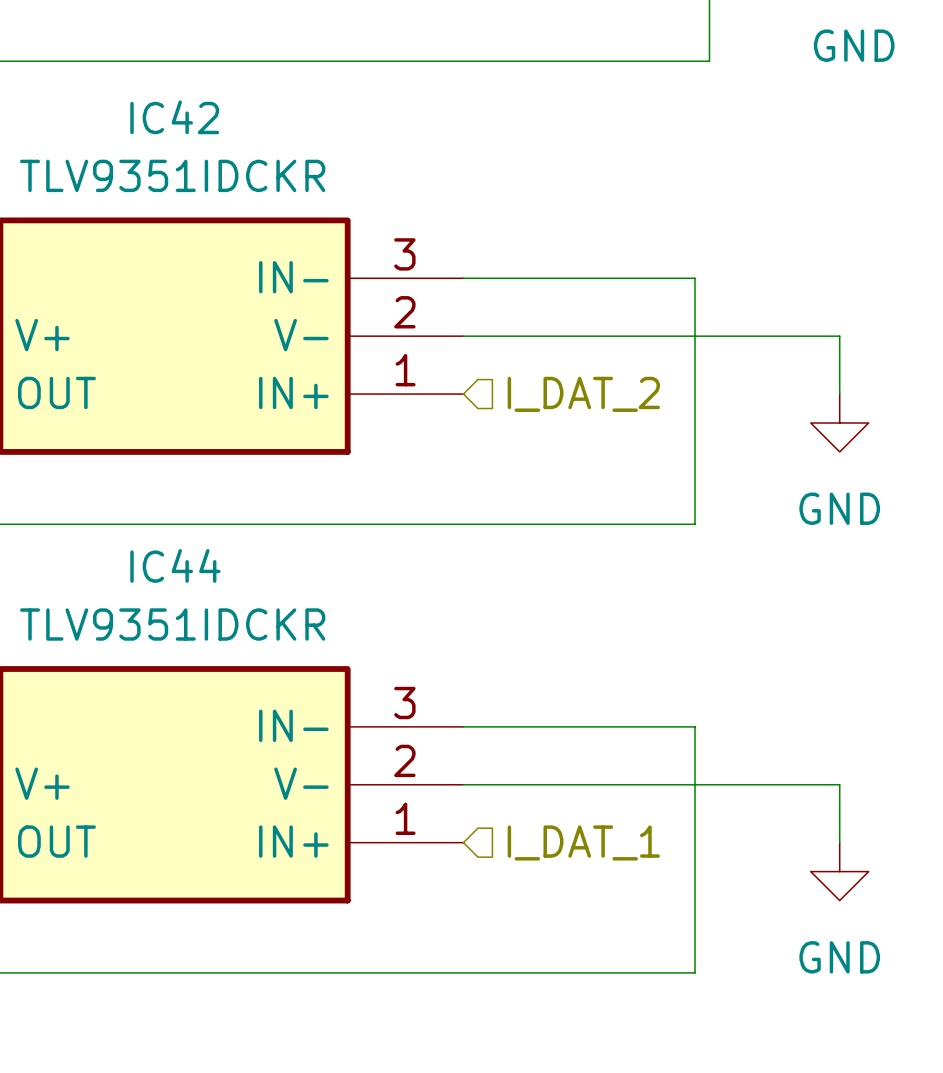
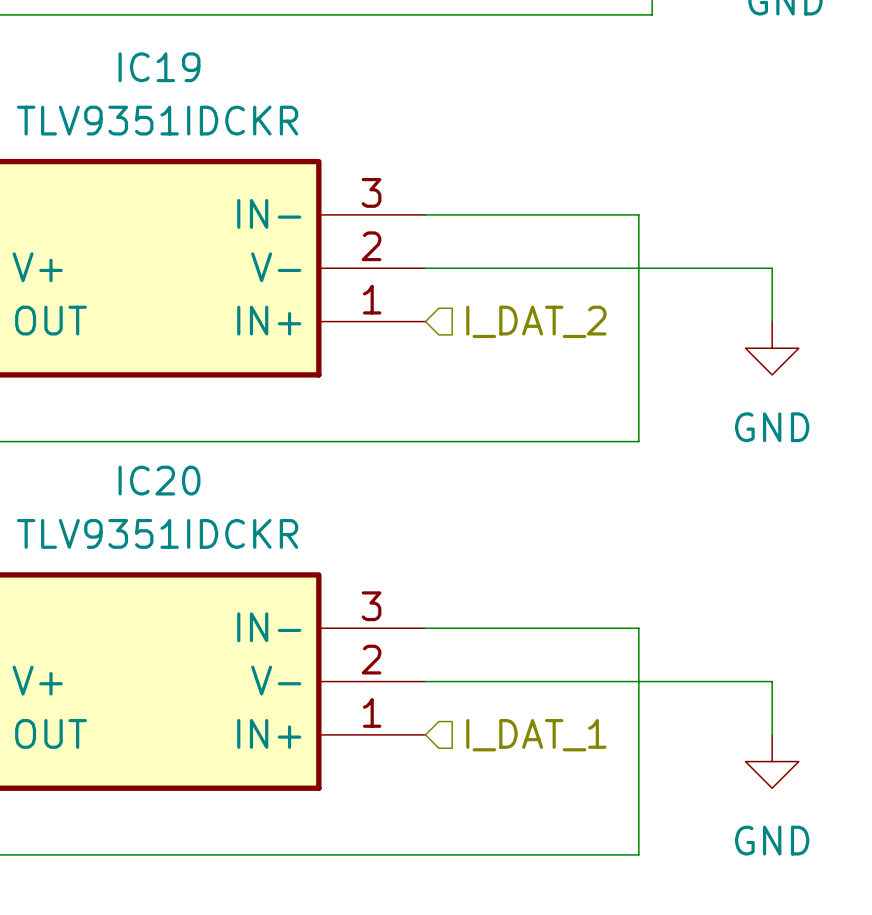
IC42 name: IC42 (174, 117) -> IC19 (159, 67)
IC44 name: IC44 (175, 565) -> IC20 (159, 480)

